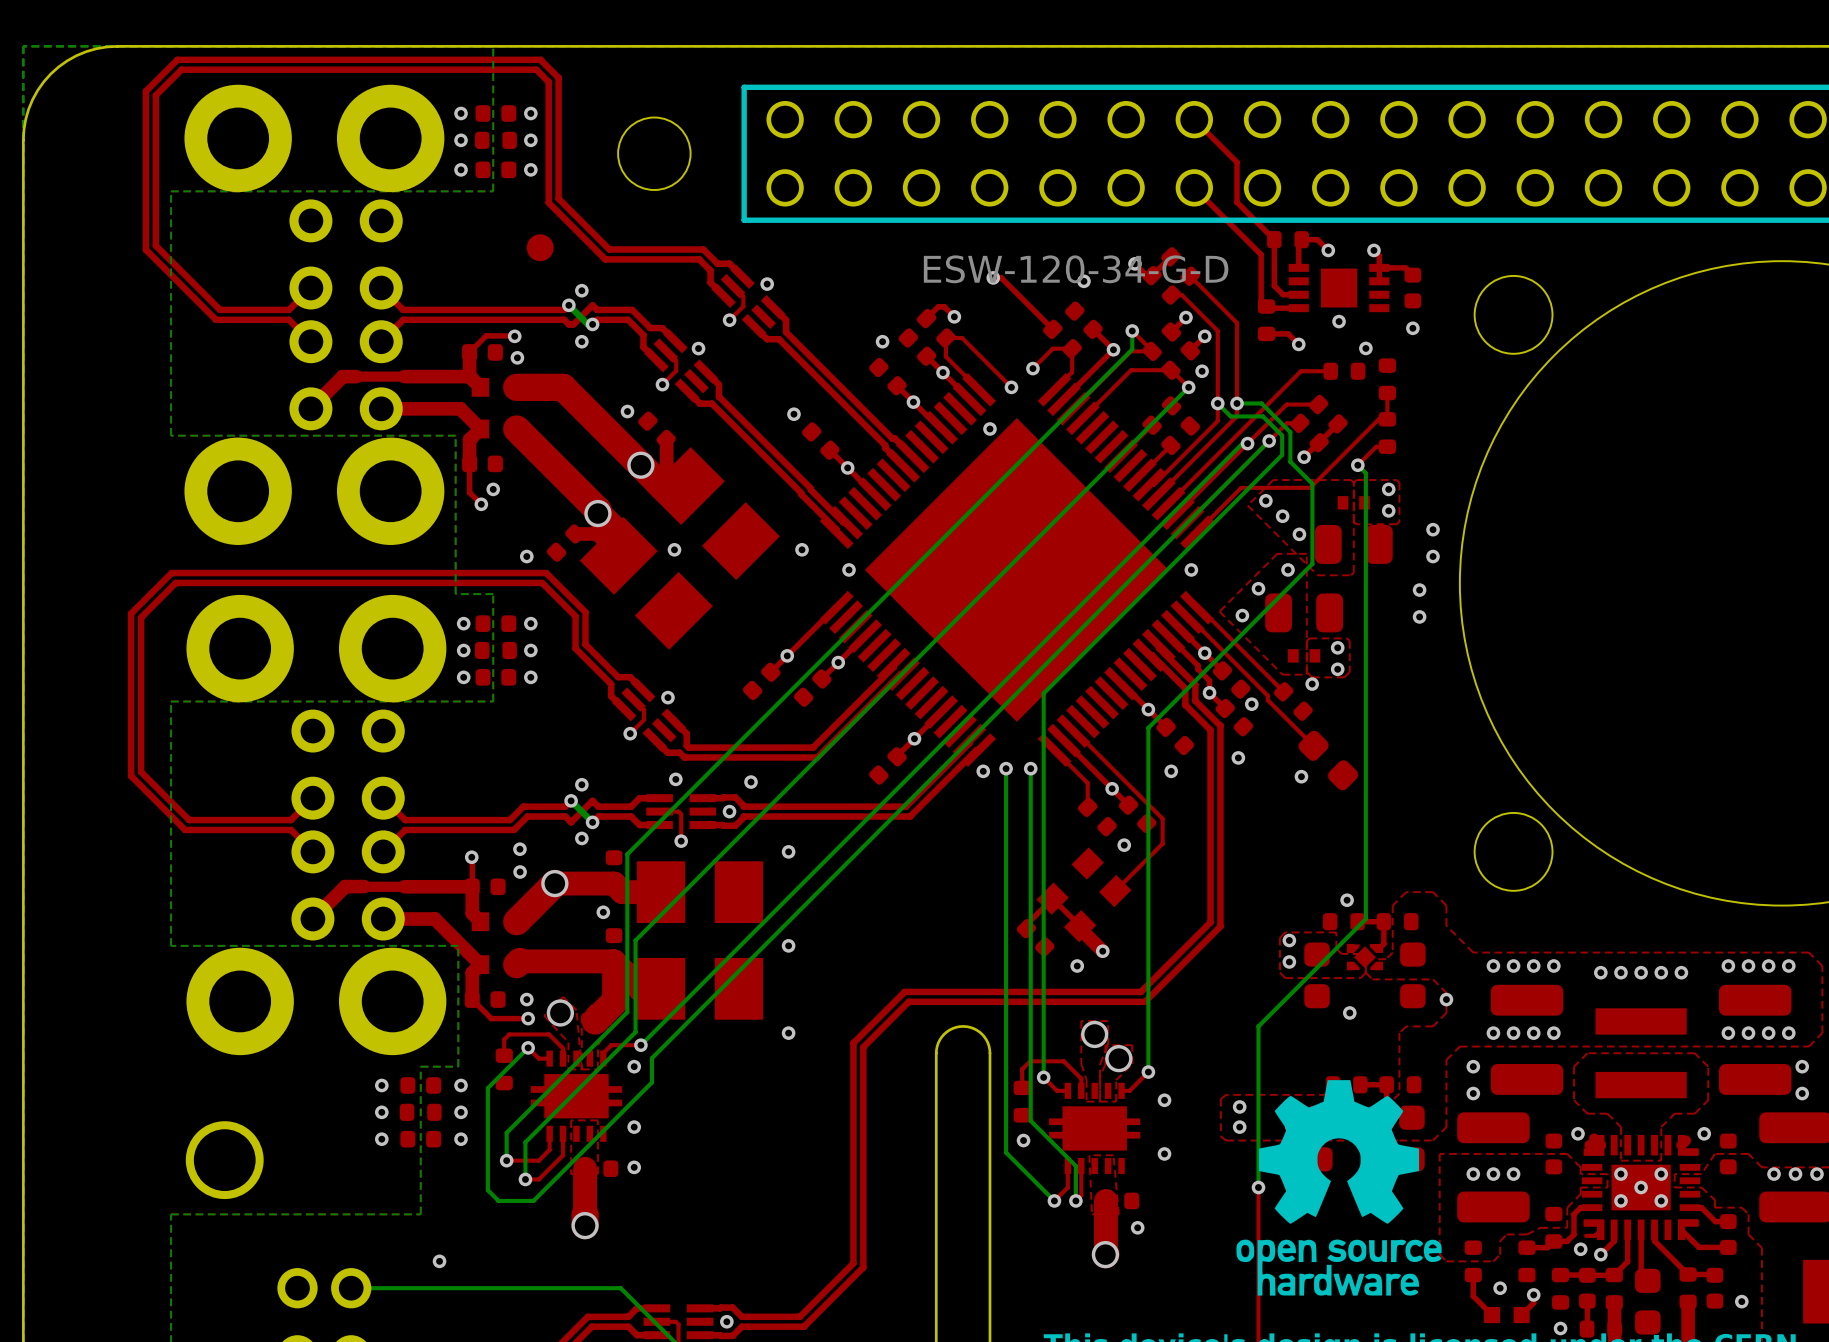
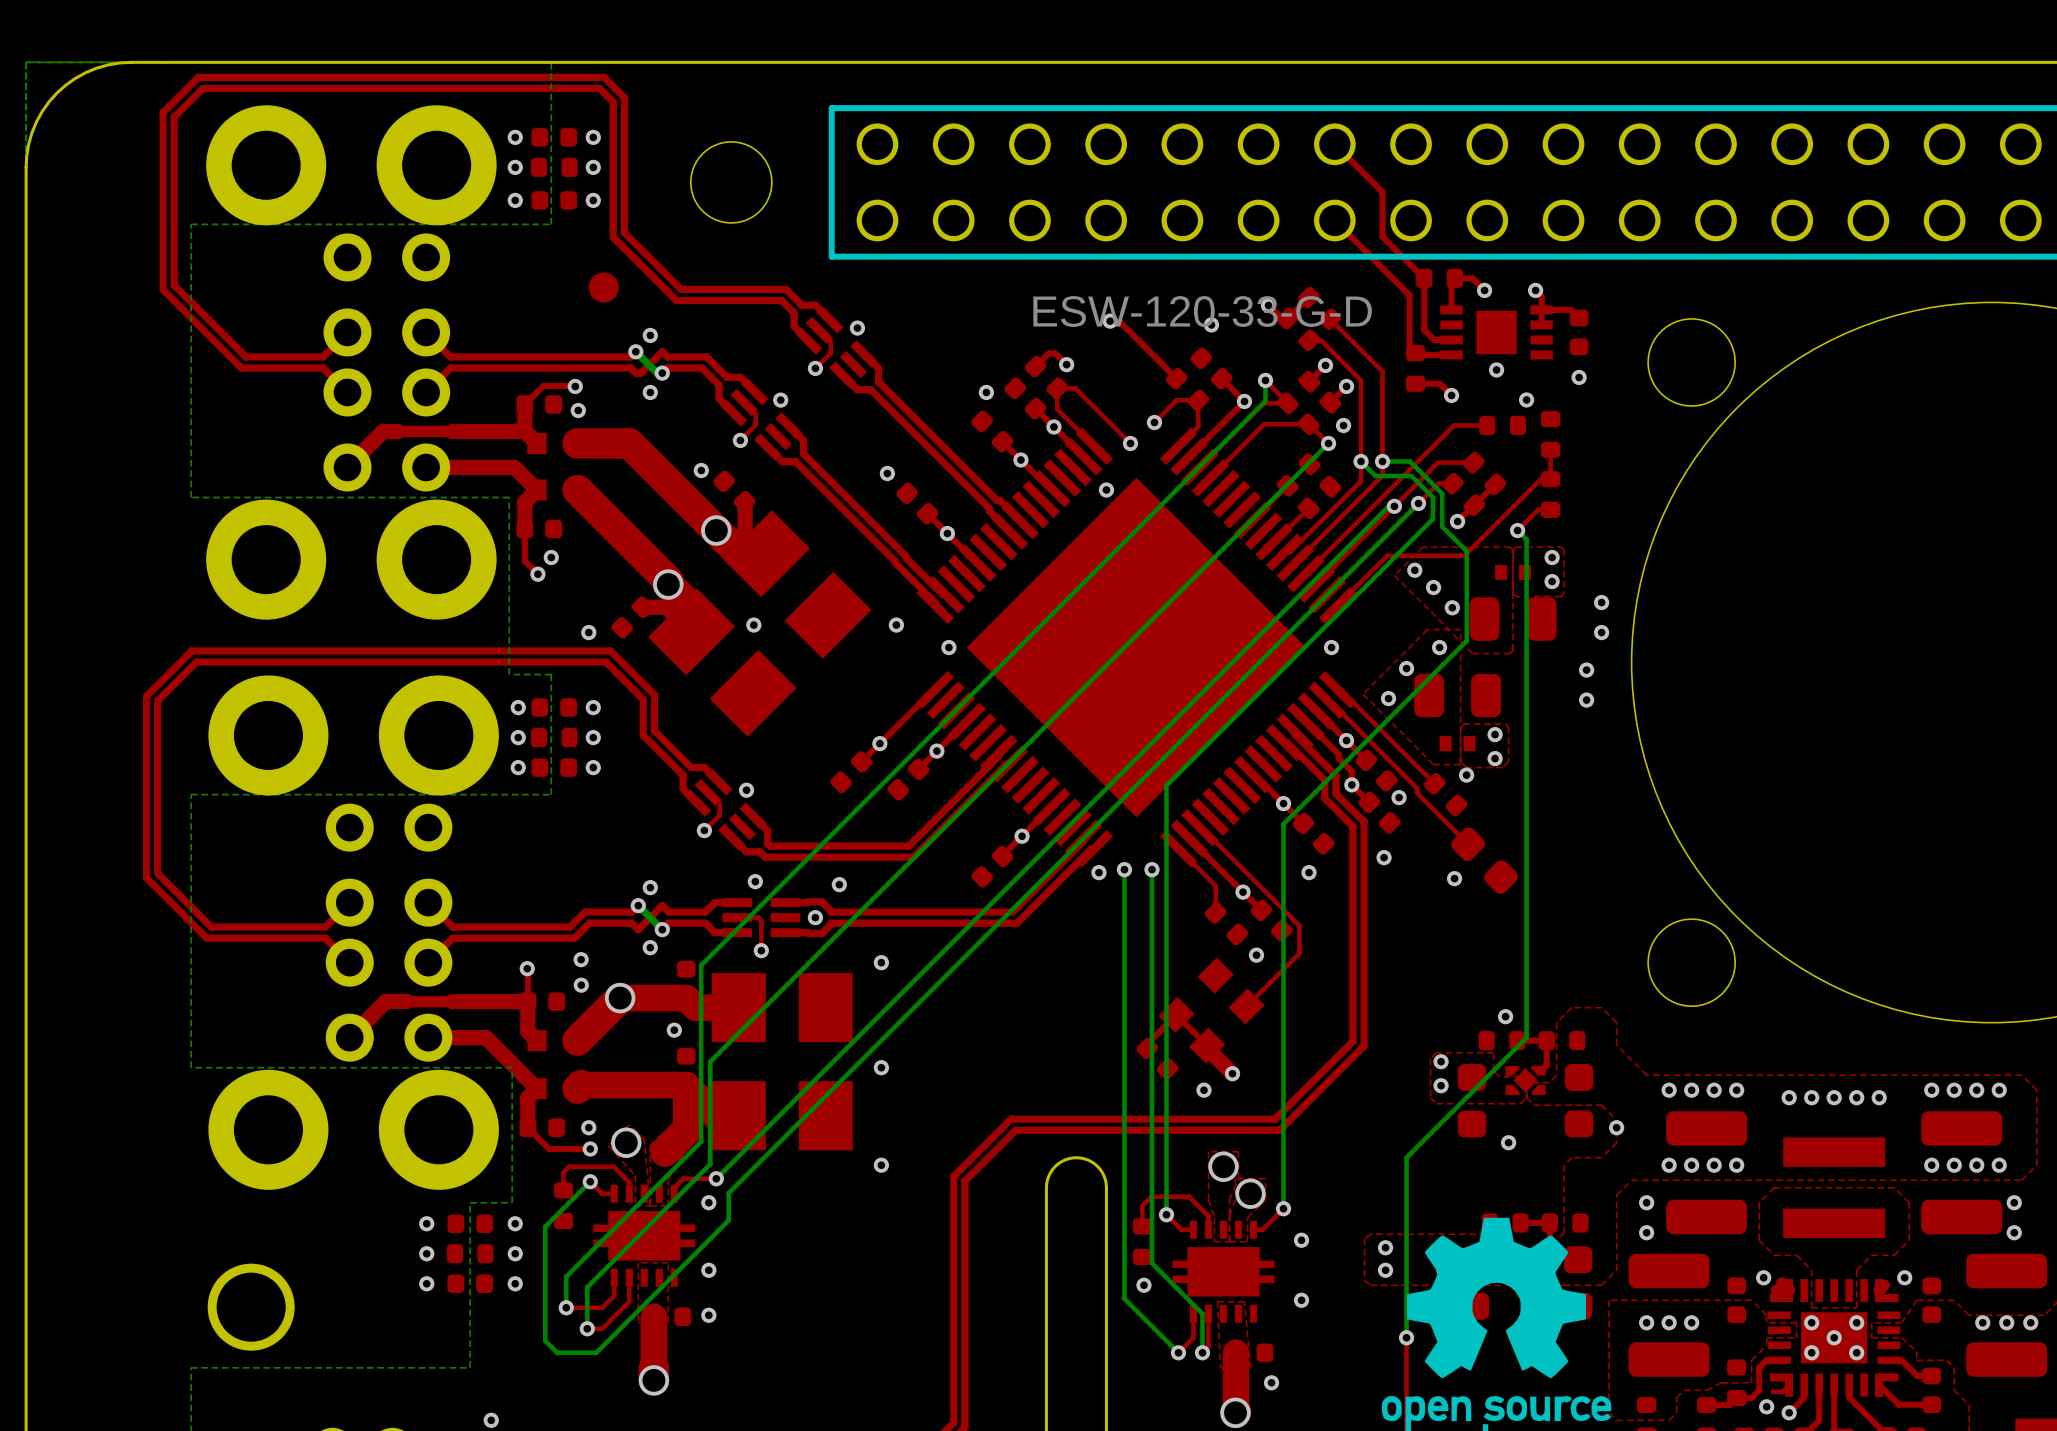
part value: ESW-120-34-G-D (1076, 269) -> ESW-120-33-G-D (1202, 311)

